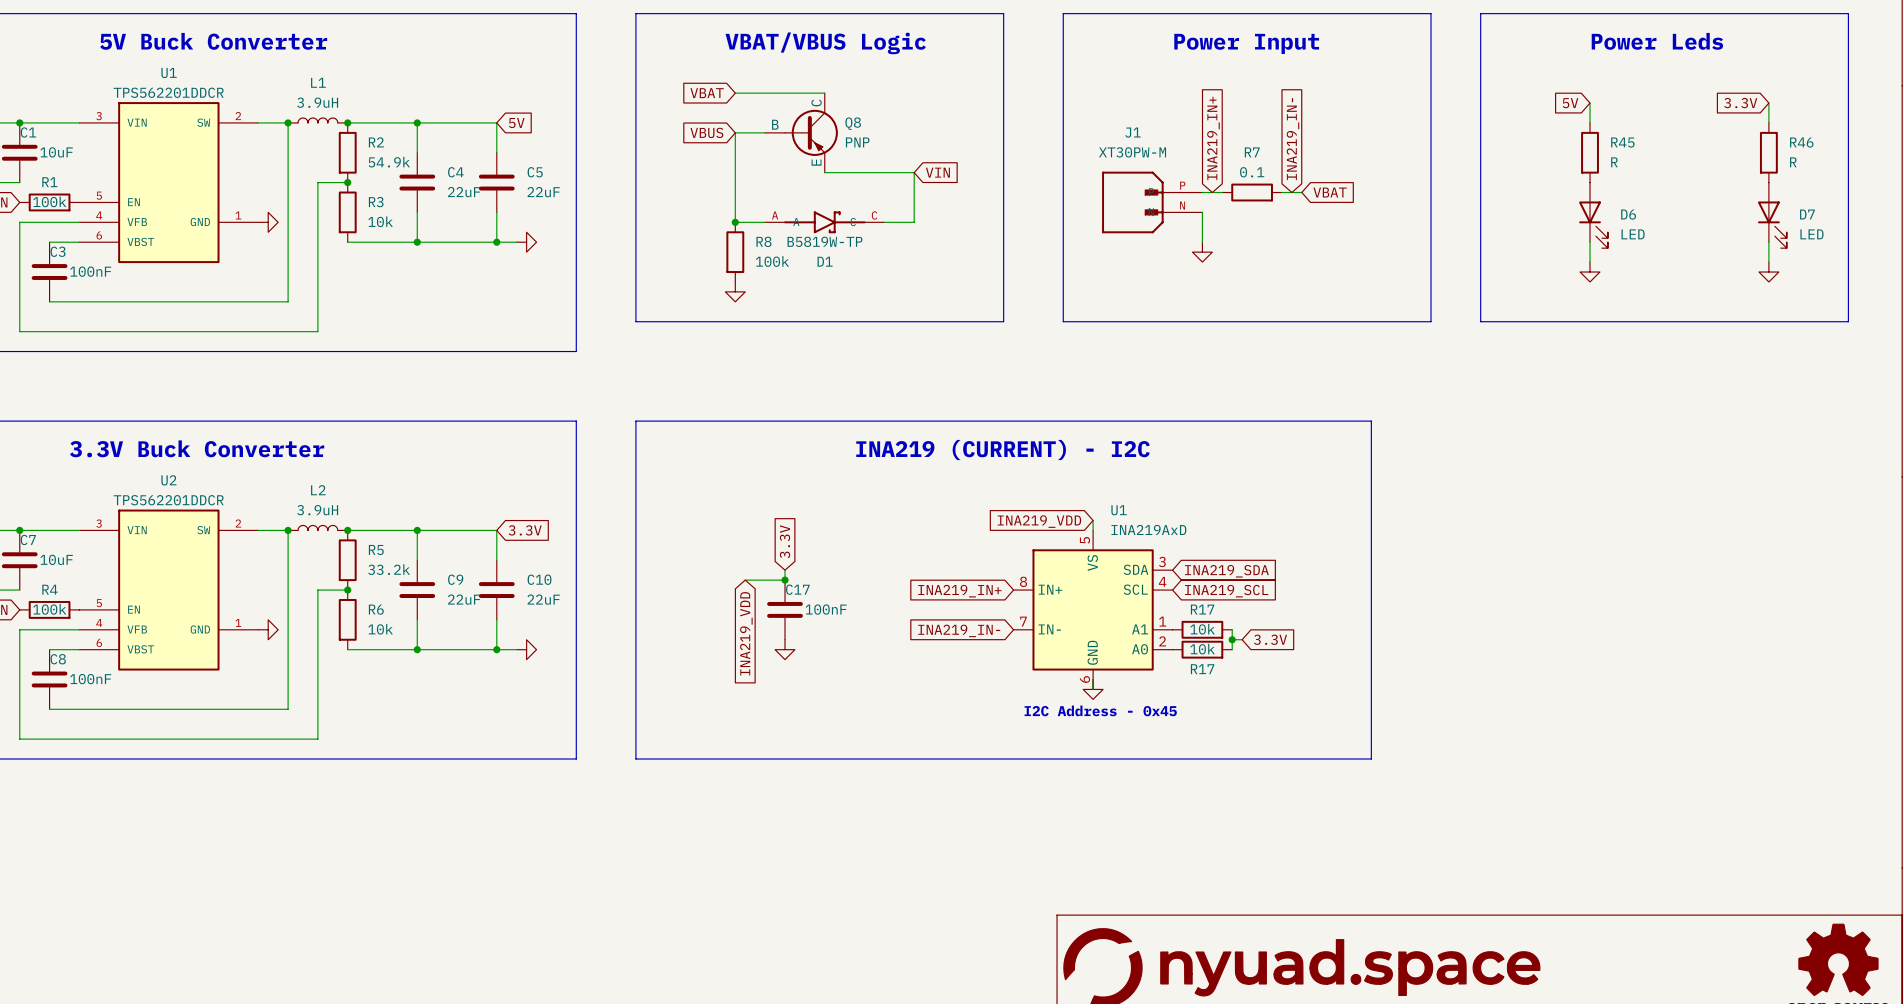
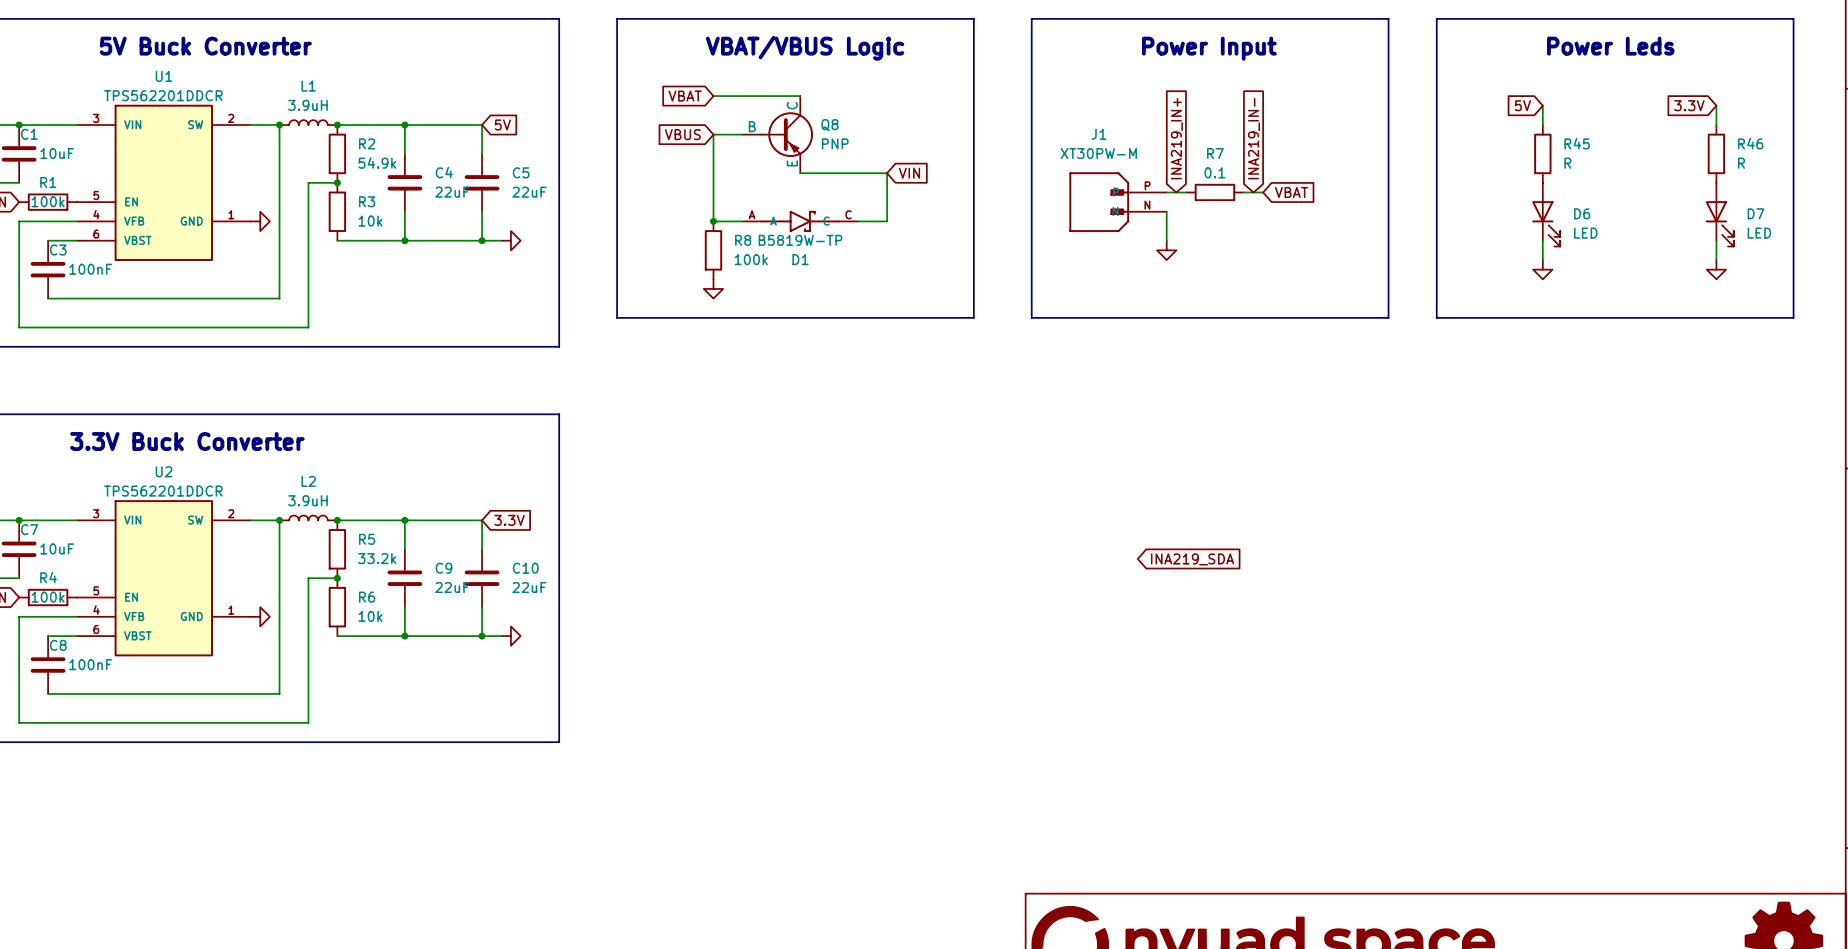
line: (635, 421) (1371, 421) (1371, 759) (635, 759) (635, 421) -> none
text: INA219 (CURRENT) - I2C (1002, 450) -> none
wire: (1093, 520) (1093, 530) -> none
global label: INA219_VDD (1039, 521) -> none
global label: 3.3V (785, 541) -> none
wire: (785, 570) (785, 580) (745, 580) -> none
junction: (785, 580) -> none
global label: INA219_IN+ (959, 591) -> none
global label: INA219_SCL (1226, 591) -> none
C17: 100nF (785, 609) -> none
U1: INA219AxD (1093, 609) -> none
R17: 10k (1202, 629) -> none
wire: (1232, 629) (1232, 649) -> none
global label: INA219_IN- (959, 630) -> none
global label: INA219_VDD (746, 633) -> none
wire: (1232, 639) (1242, 639) -> none
junction: (1232, 639) -> none
global label: 3.3V (1270, 639) -> none
power symbol: (785, 649) -> none
R17: 10k (1202, 649) -> none
wire: (1093, 679) (1093, 689) -> none
power symbol: (1093, 689) -> none
text: I2C Address - 0x45 (1100, 710) -> none

